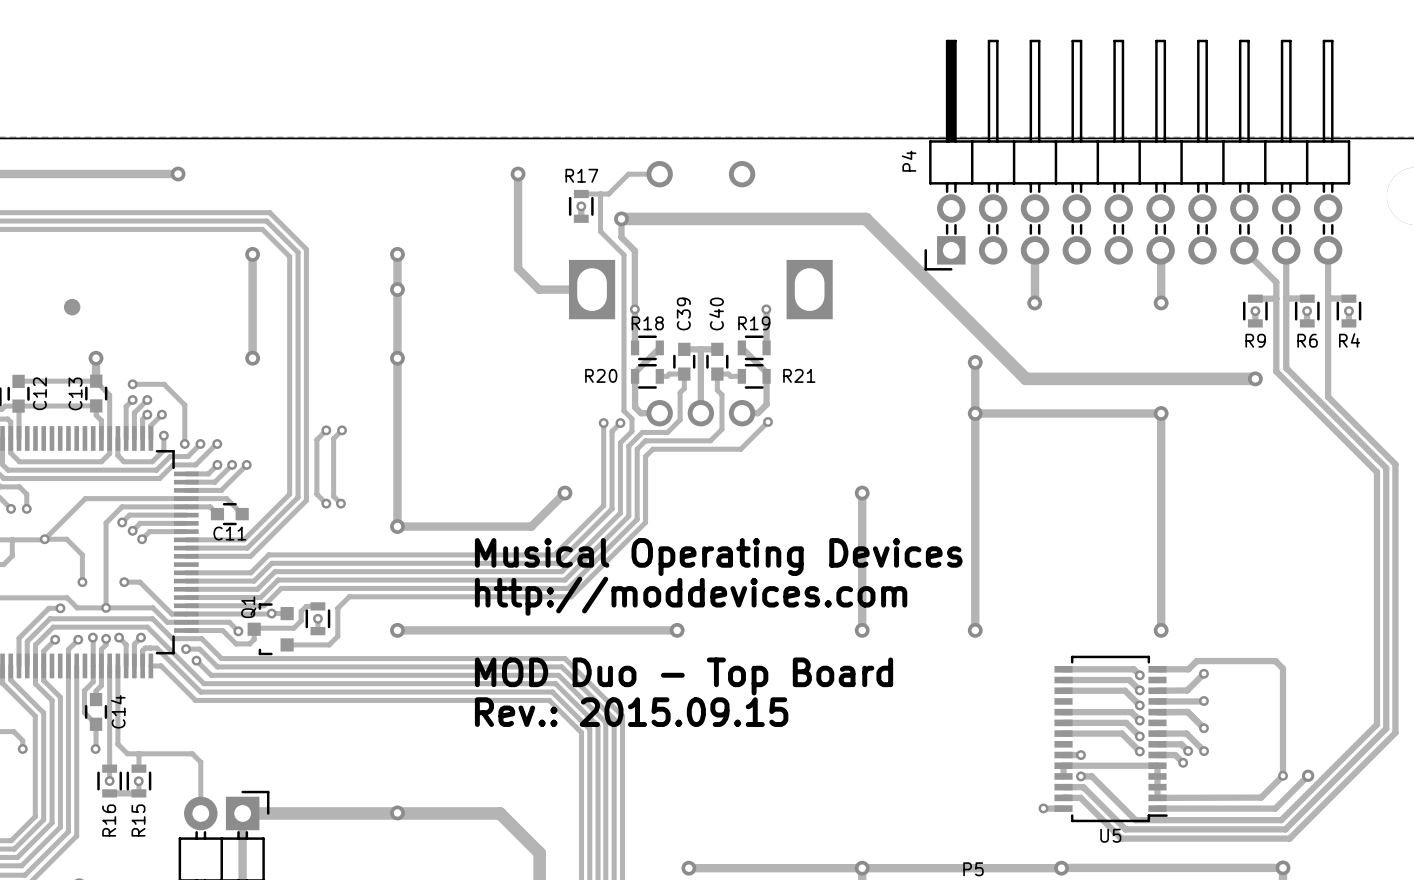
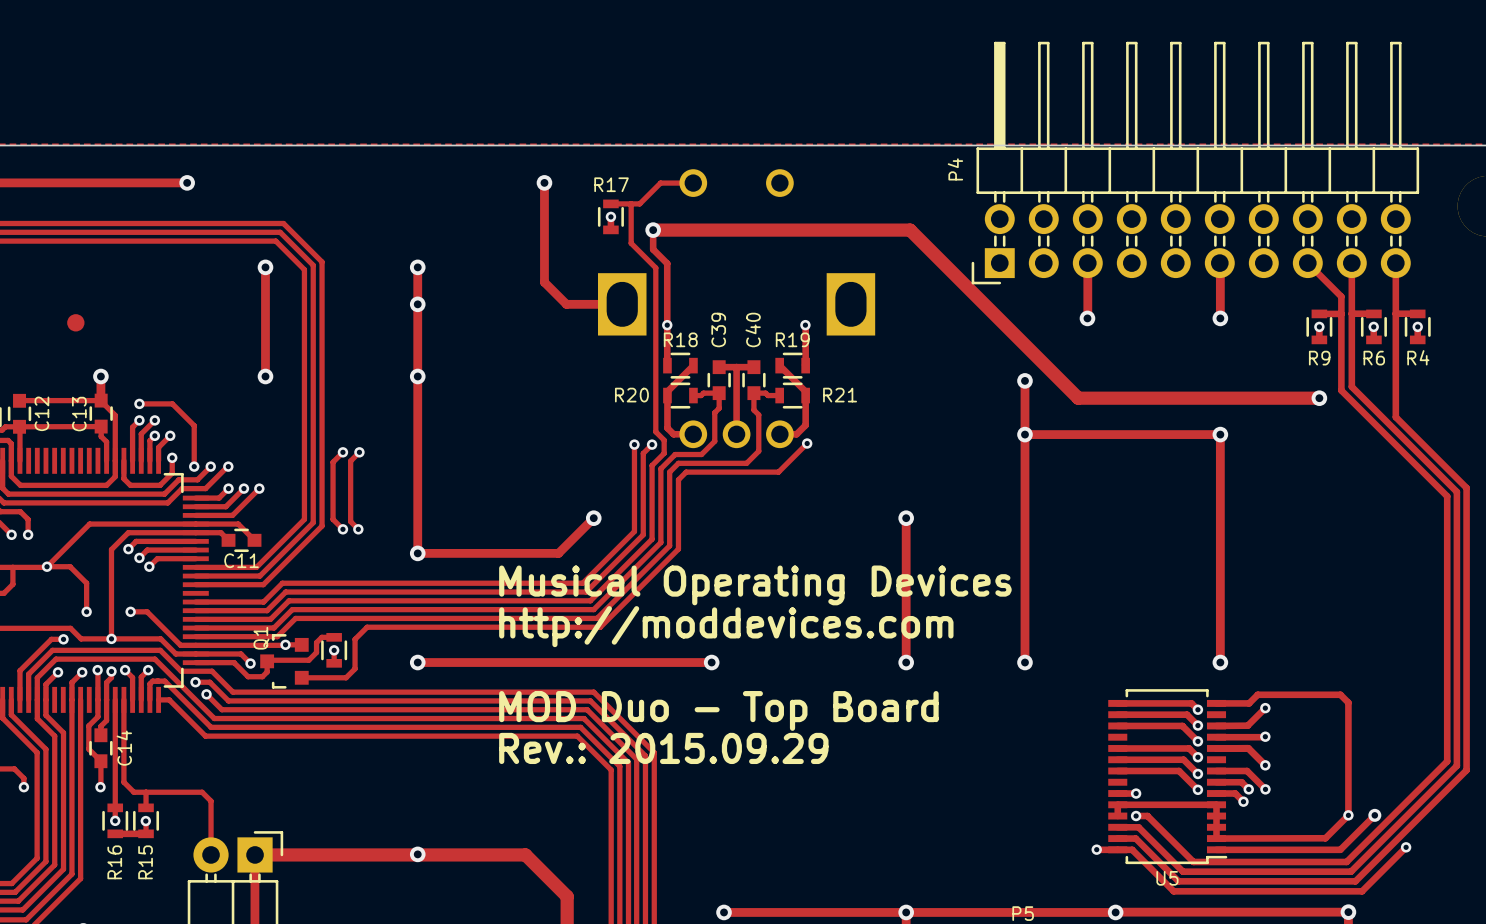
text: Rev.: 2015.09.15 (631, 712) -> Rev.: 2015.09.29 (663, 748)
track: none -> (1406, 847) (1362, 891) (1173, 891) (1132, 849) (1117, 849)
via: none -> (1406, 847)

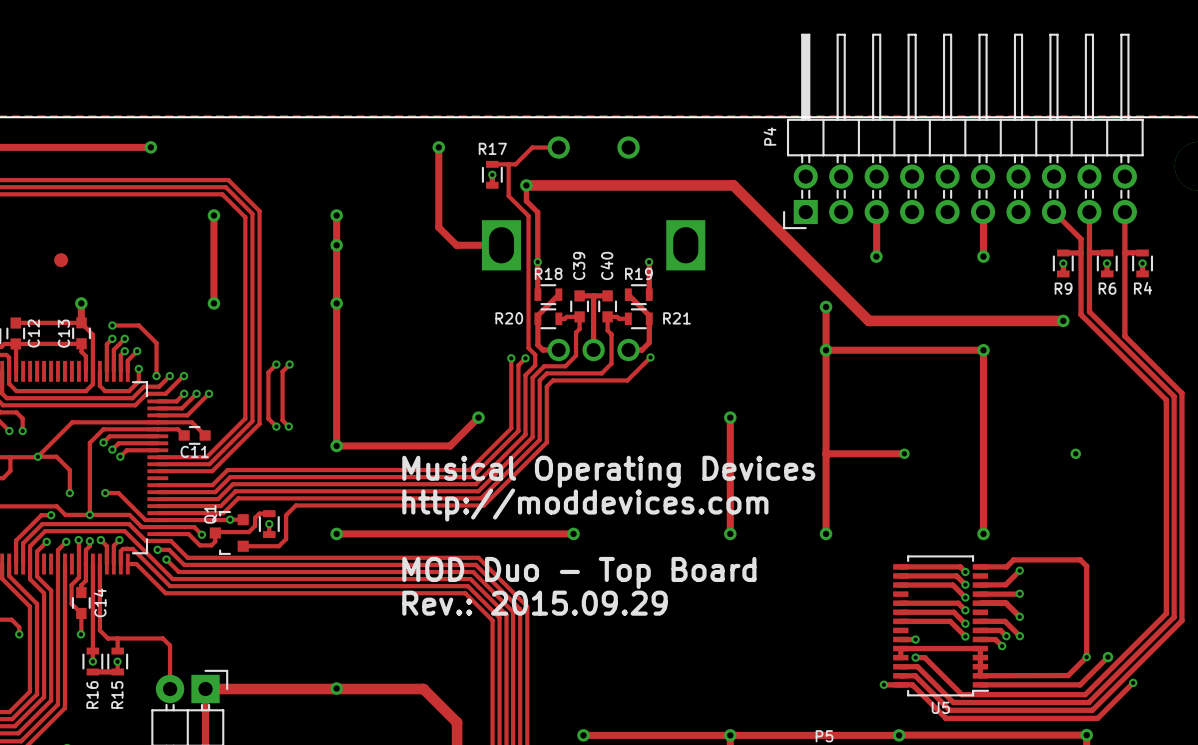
track: none -> (826, 453) (904, 453)
via: none -> (904, 453)
via: none -> (1075, 453)

